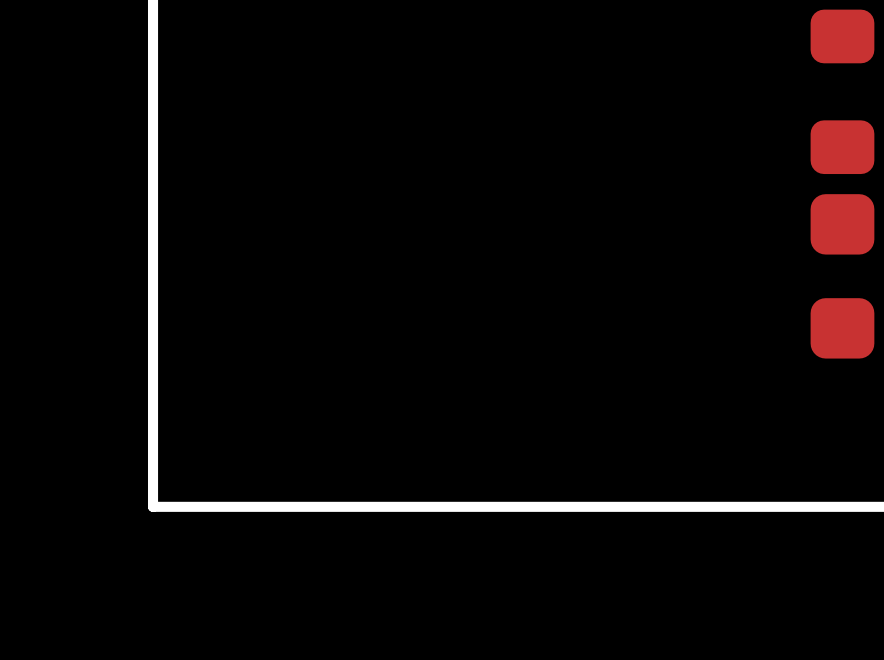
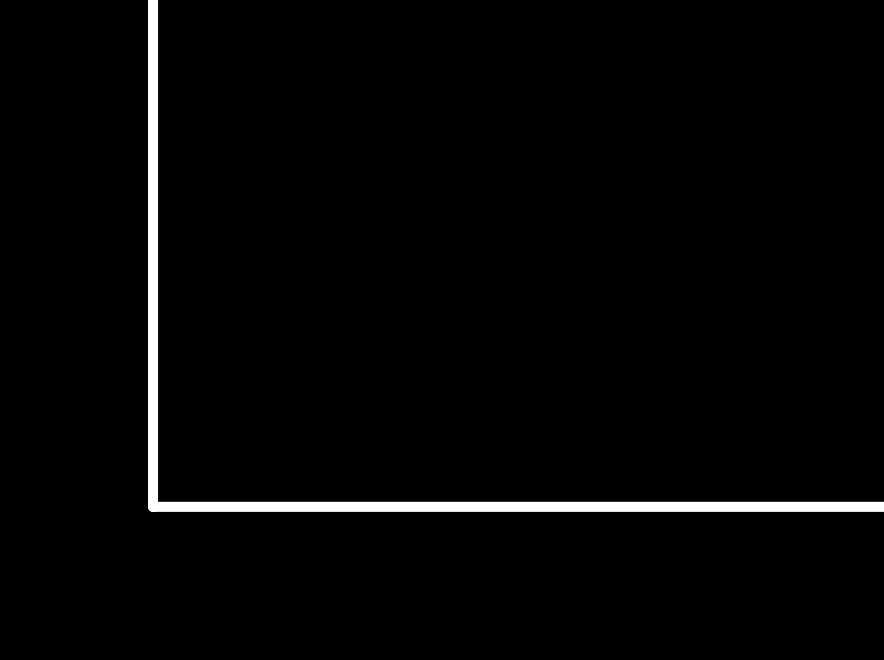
part: (842, 91) -> none
part: (842, 276) -> none

